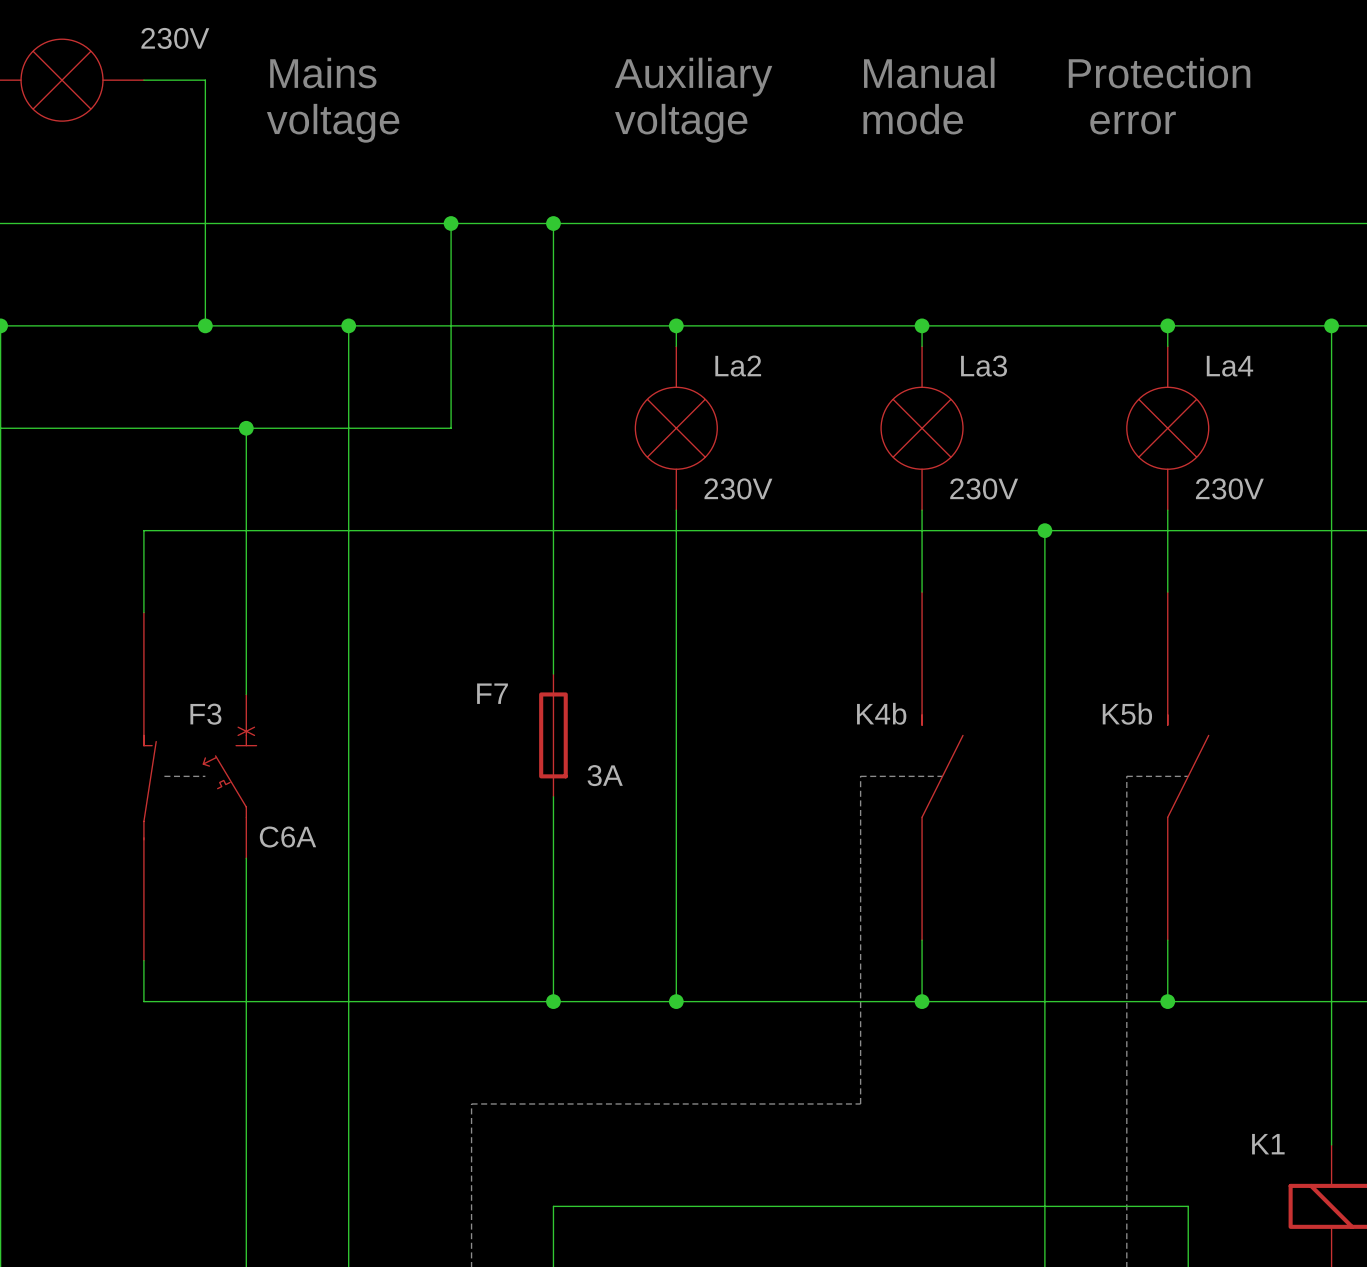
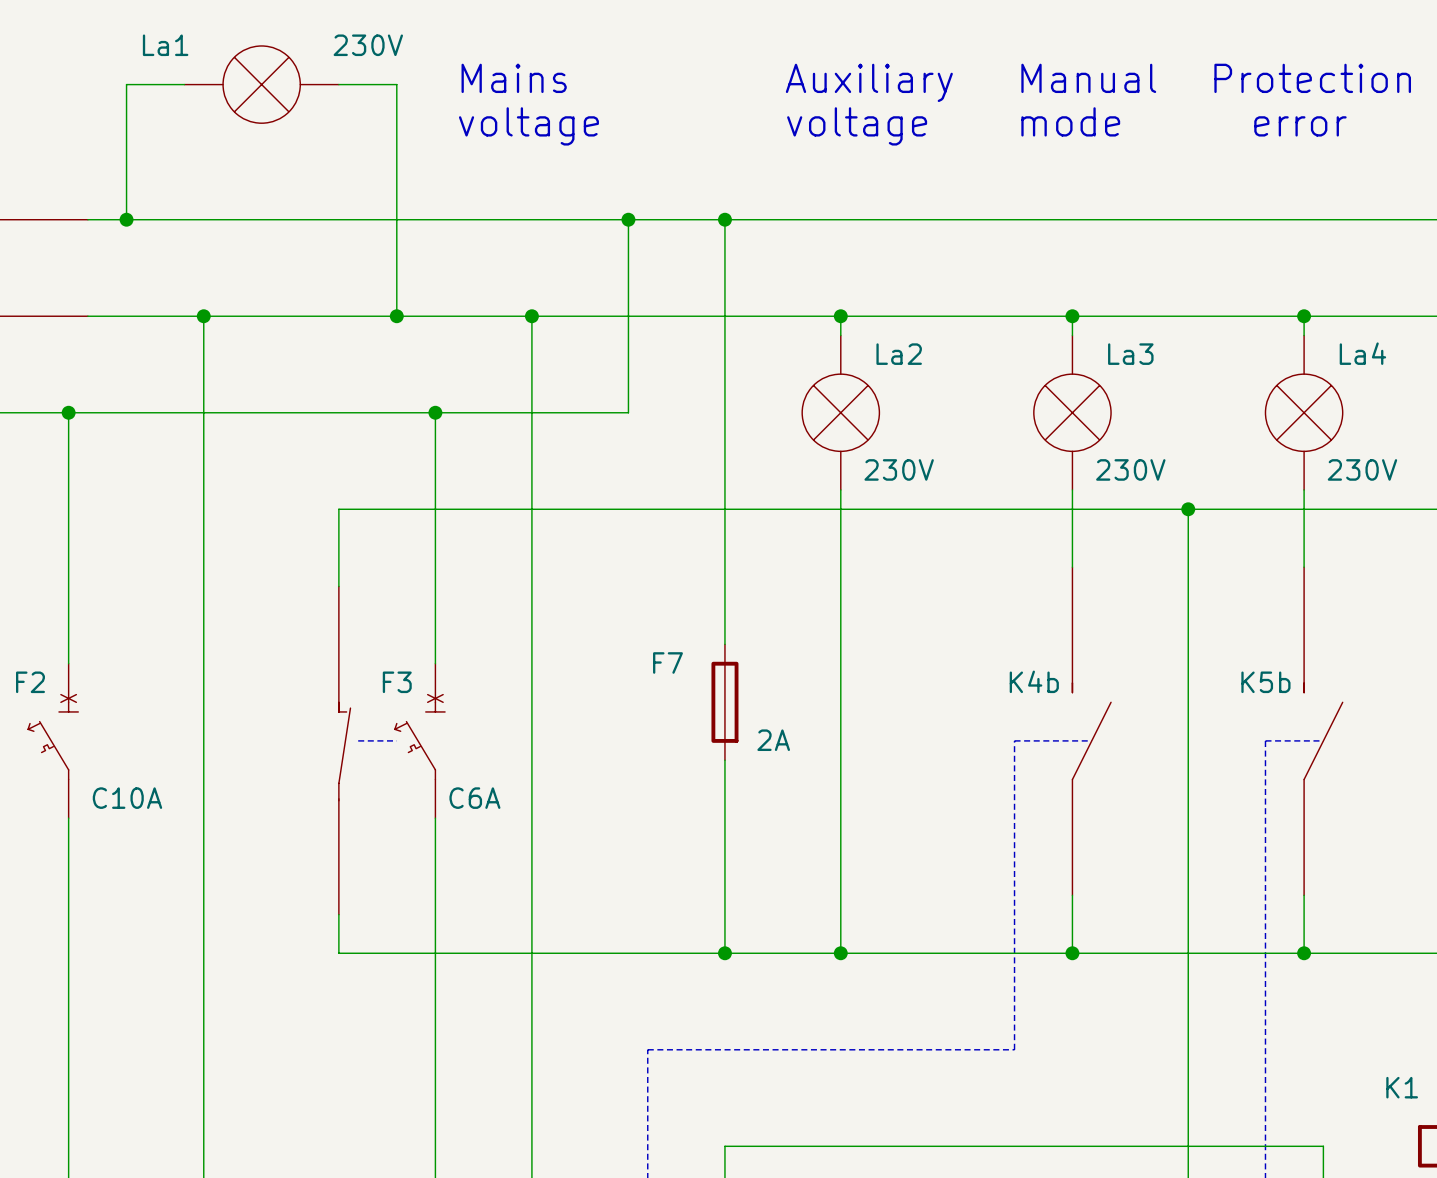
F7 value: 3A (605, 775) -> 2A (773, 740)

